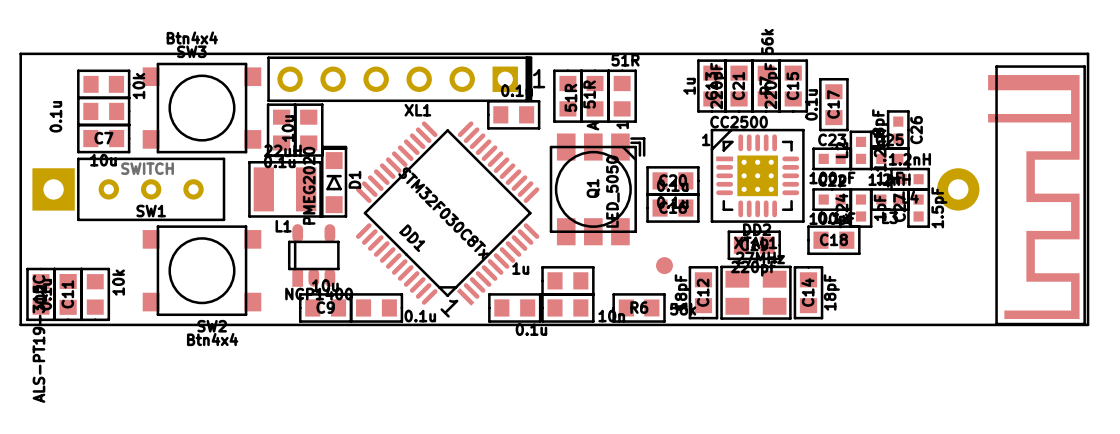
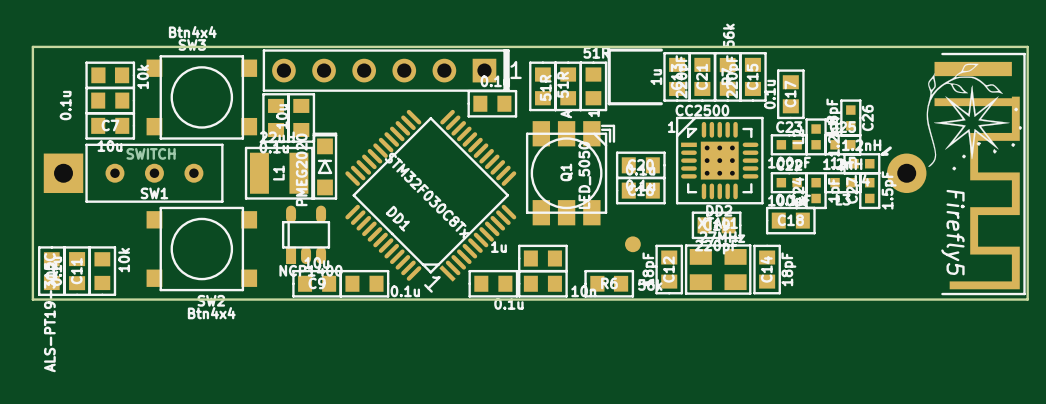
line: none -> (661, 50) (609, 50) (609, 103) (661, 103)
part footprint: [988, 65, 1086, 326] -> [934, 52, 1026, 296]
drawing: none -> [926, 63, 1022, 171]
XL1 name: XL1 (417, 110) -> none
line: none -> (890, 147) (882, 154) (887, 154)
D1 name: D1 (354, 179) -> none
L1 name rotation: 0° (283, 226) -> 90° counterclockwise (278, 173)
L1 name position: L1 (283, 226) -> L1 (278, 173)
text: none -> Firefly5 (952, 232)

